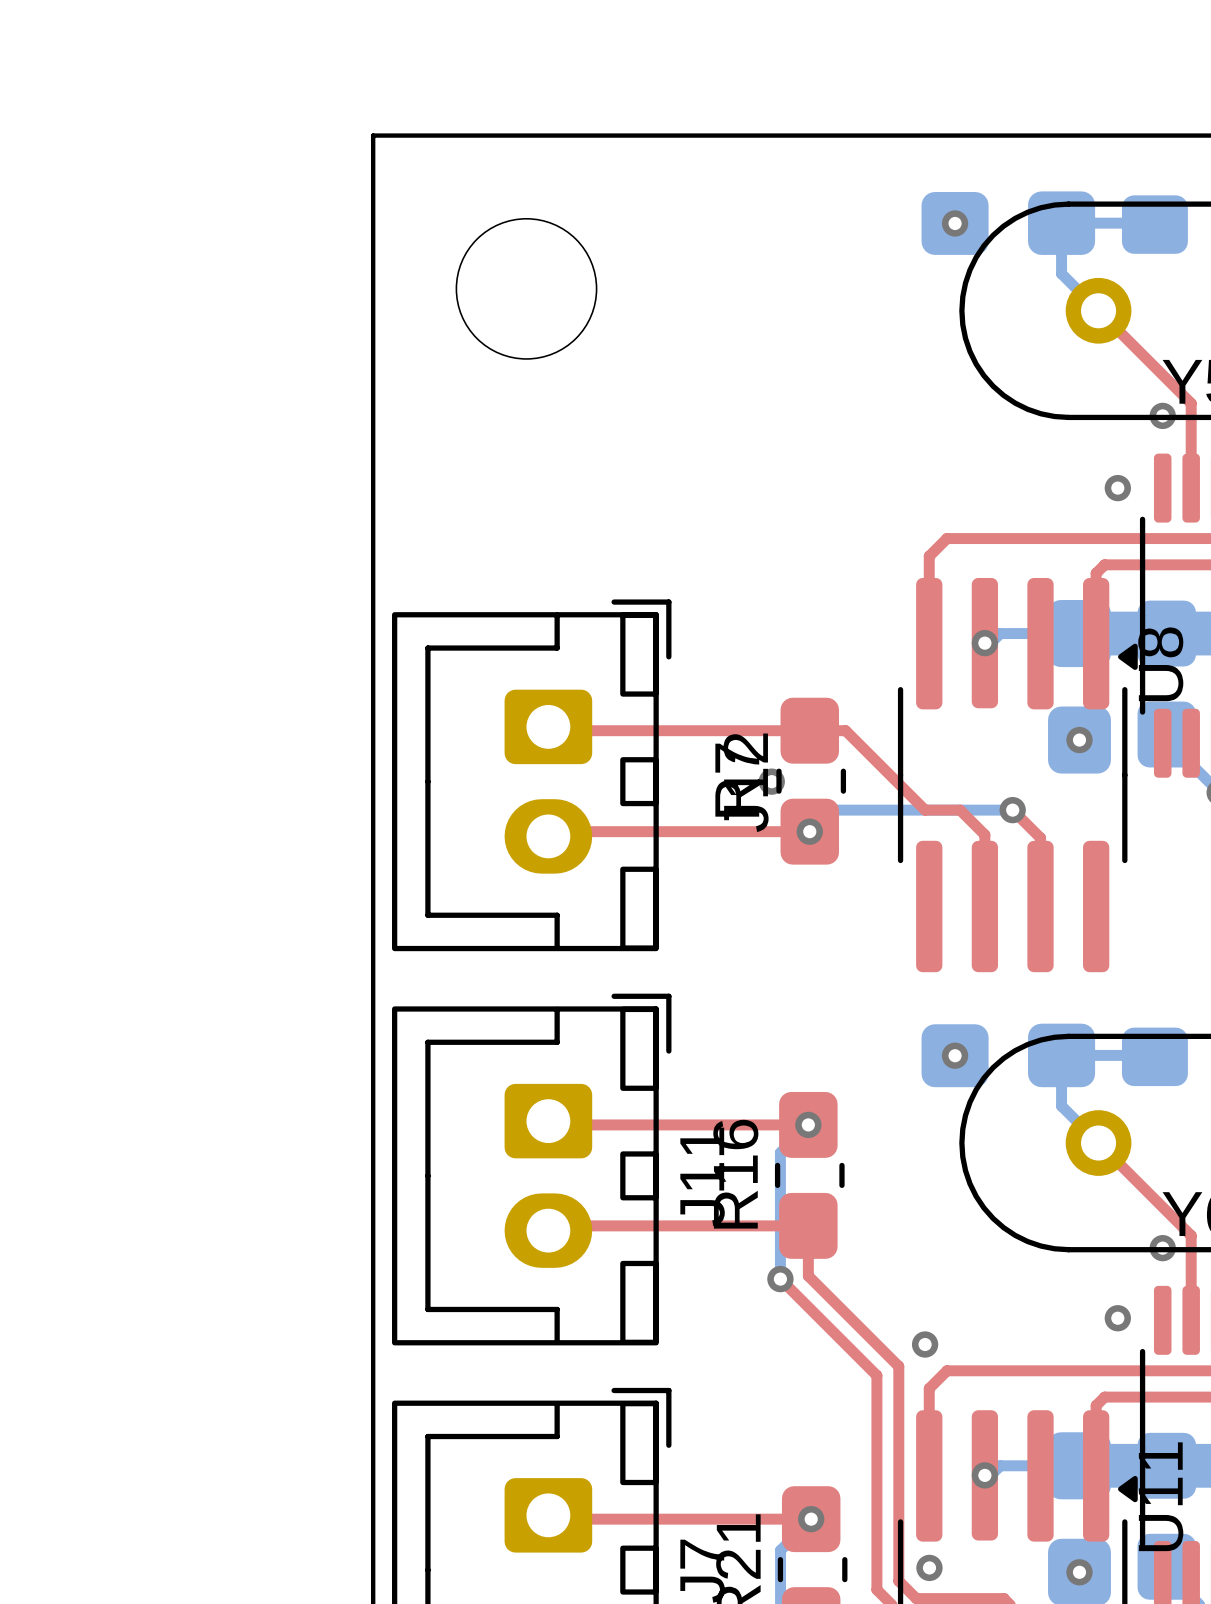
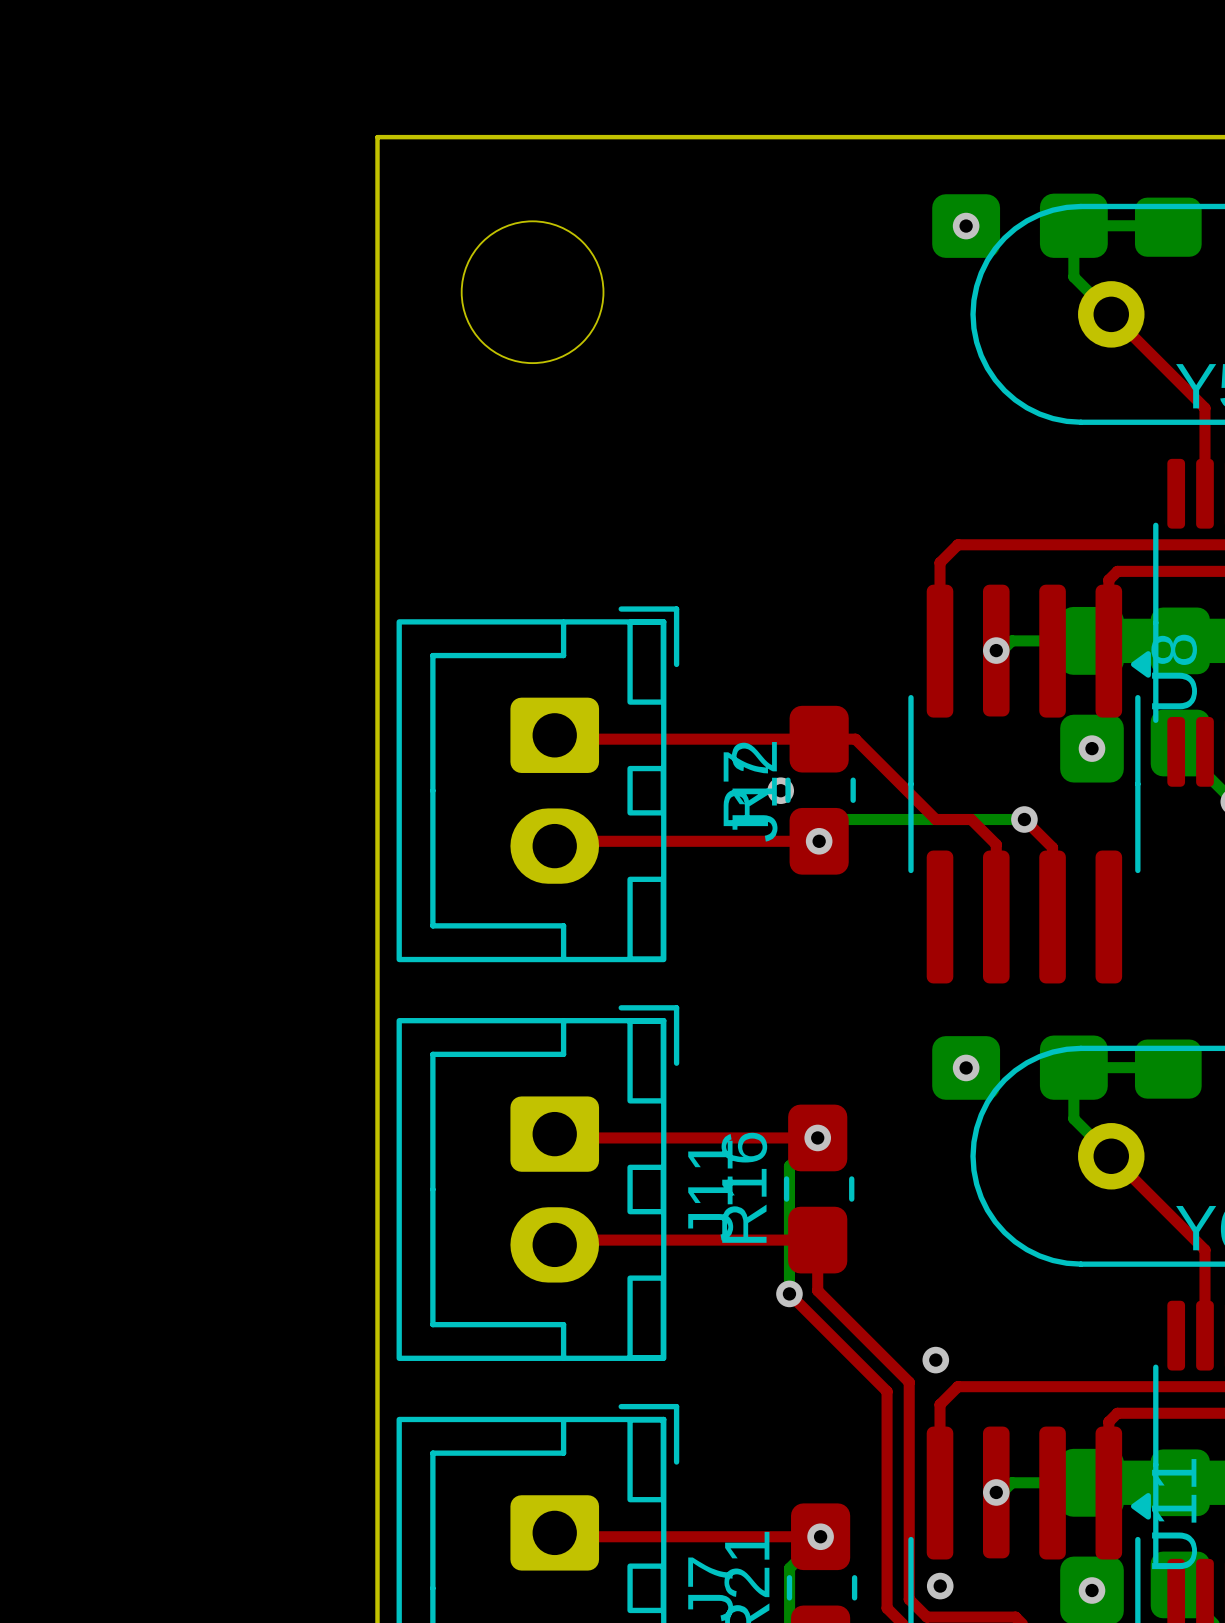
via: (1162, 415) -> none
via: (1117, 488) -> none
via: (1162, 1248) -> none
via: (1117, 1318) -> none

